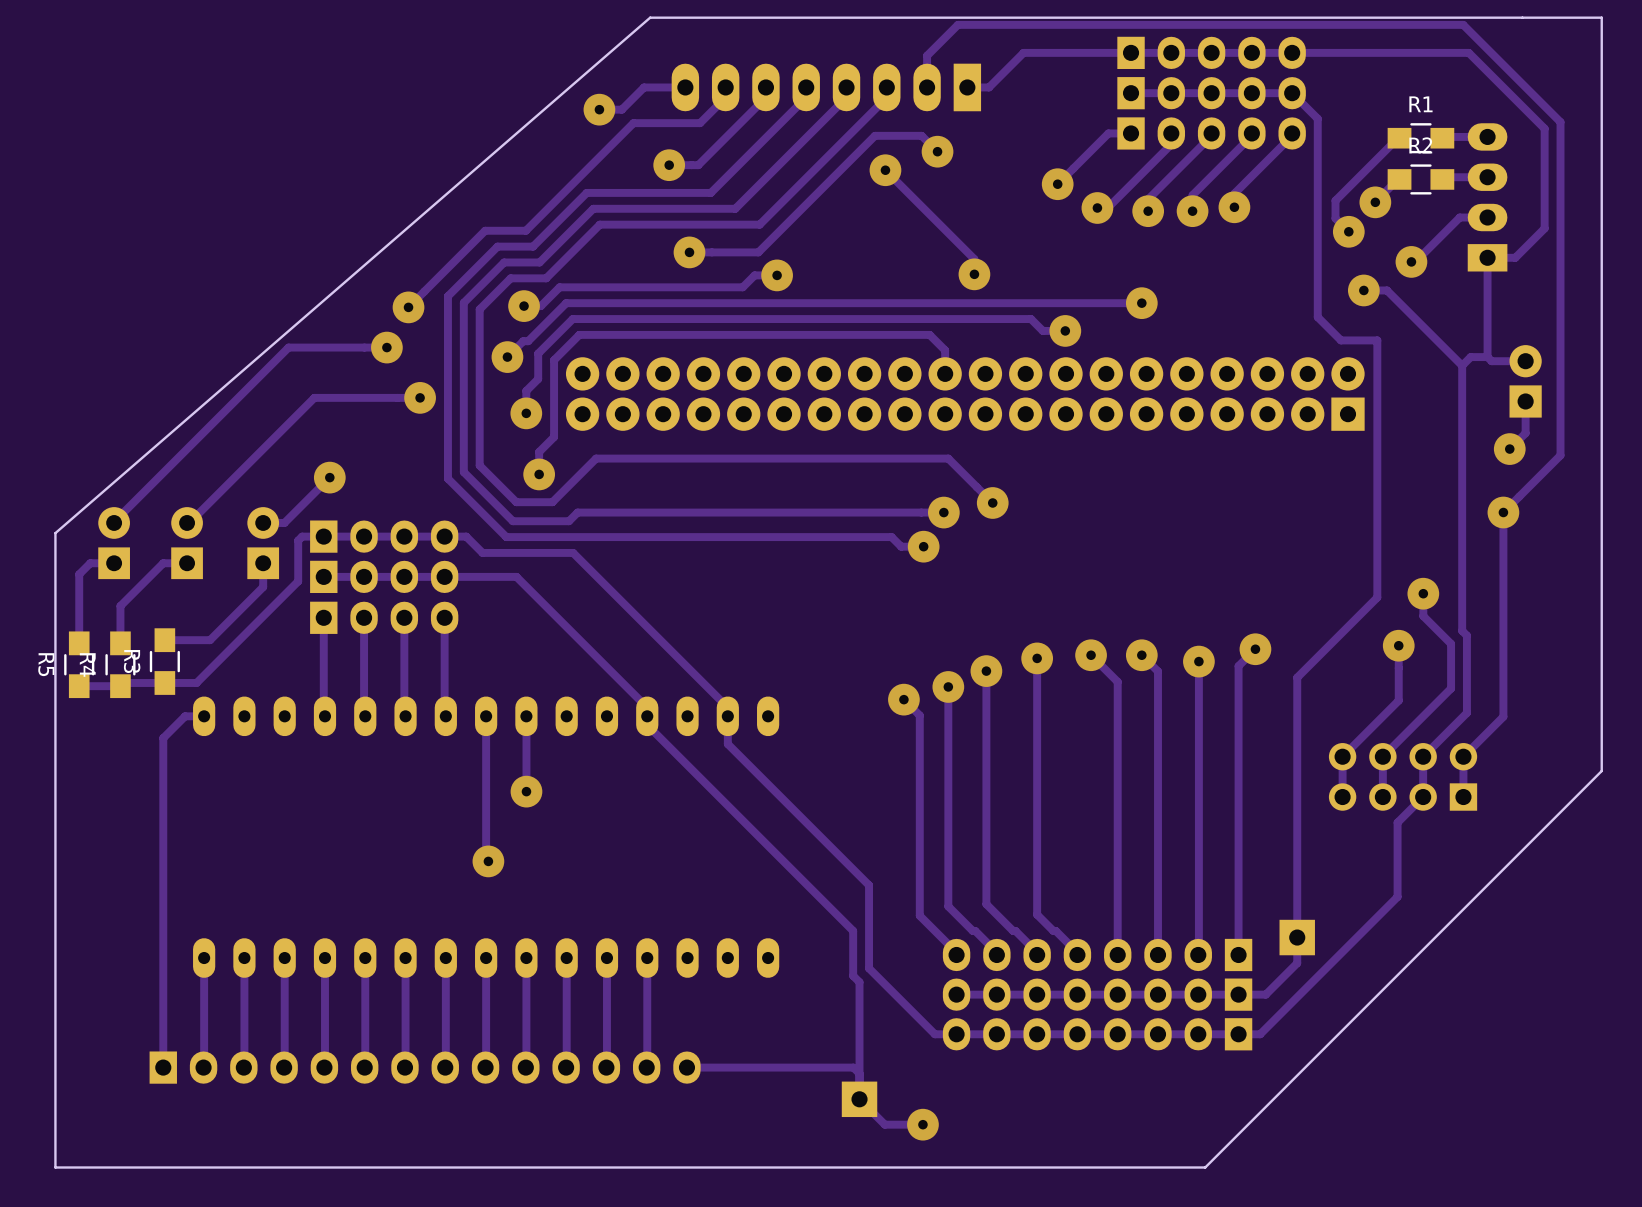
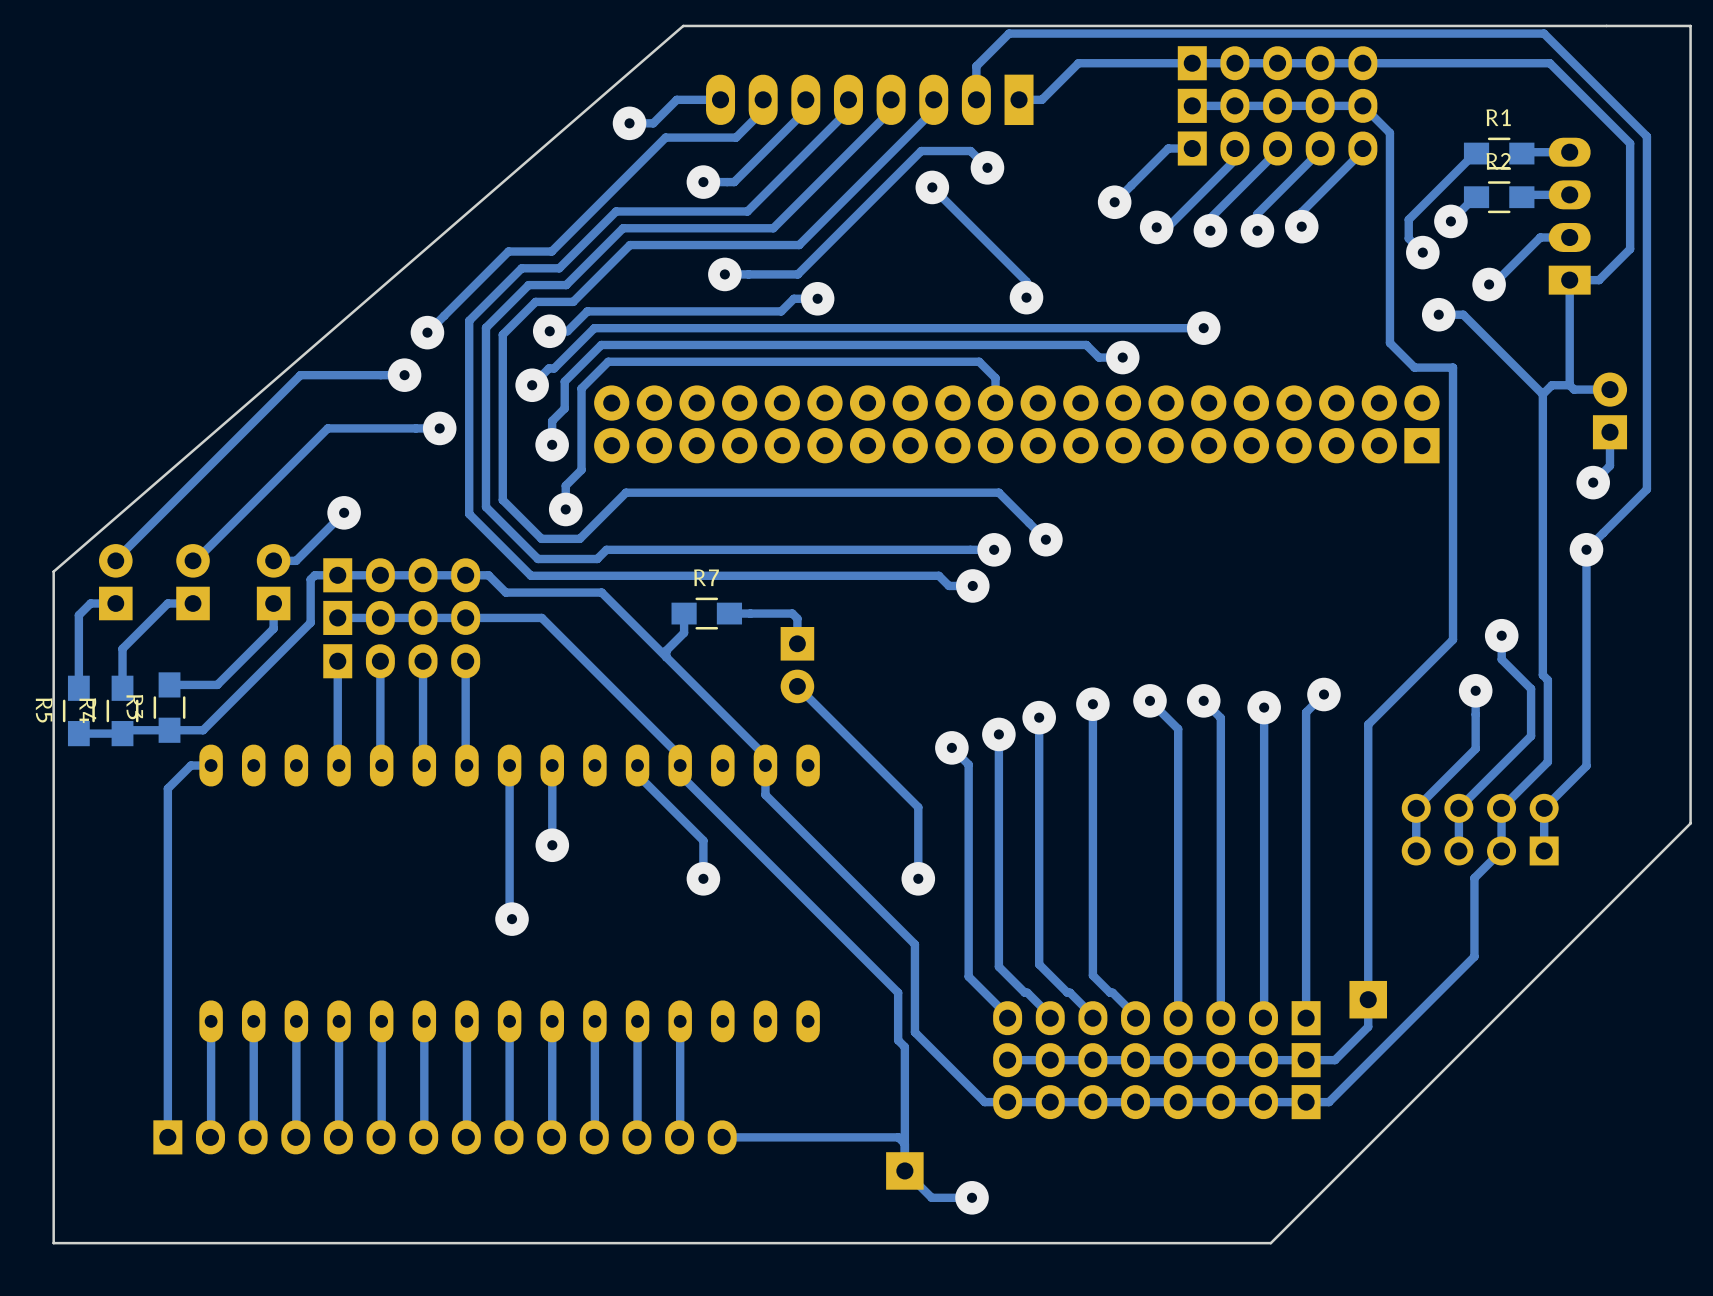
track: none -> (684, 613) (684, 632) (666, 650) (666, 657)
R7: none -> (706, 613)
track: none -> (729, 613) (792, 613) (797, 618) (797, 643)
part: none -> (797, 665)
track: none -> (797, 686) (918, 807) (918, 878)
track: none -> (637, 765) (637, 774) (703, 840) (703, 878)
via: none -> (703, 878)
via: none -> (918, 878)

